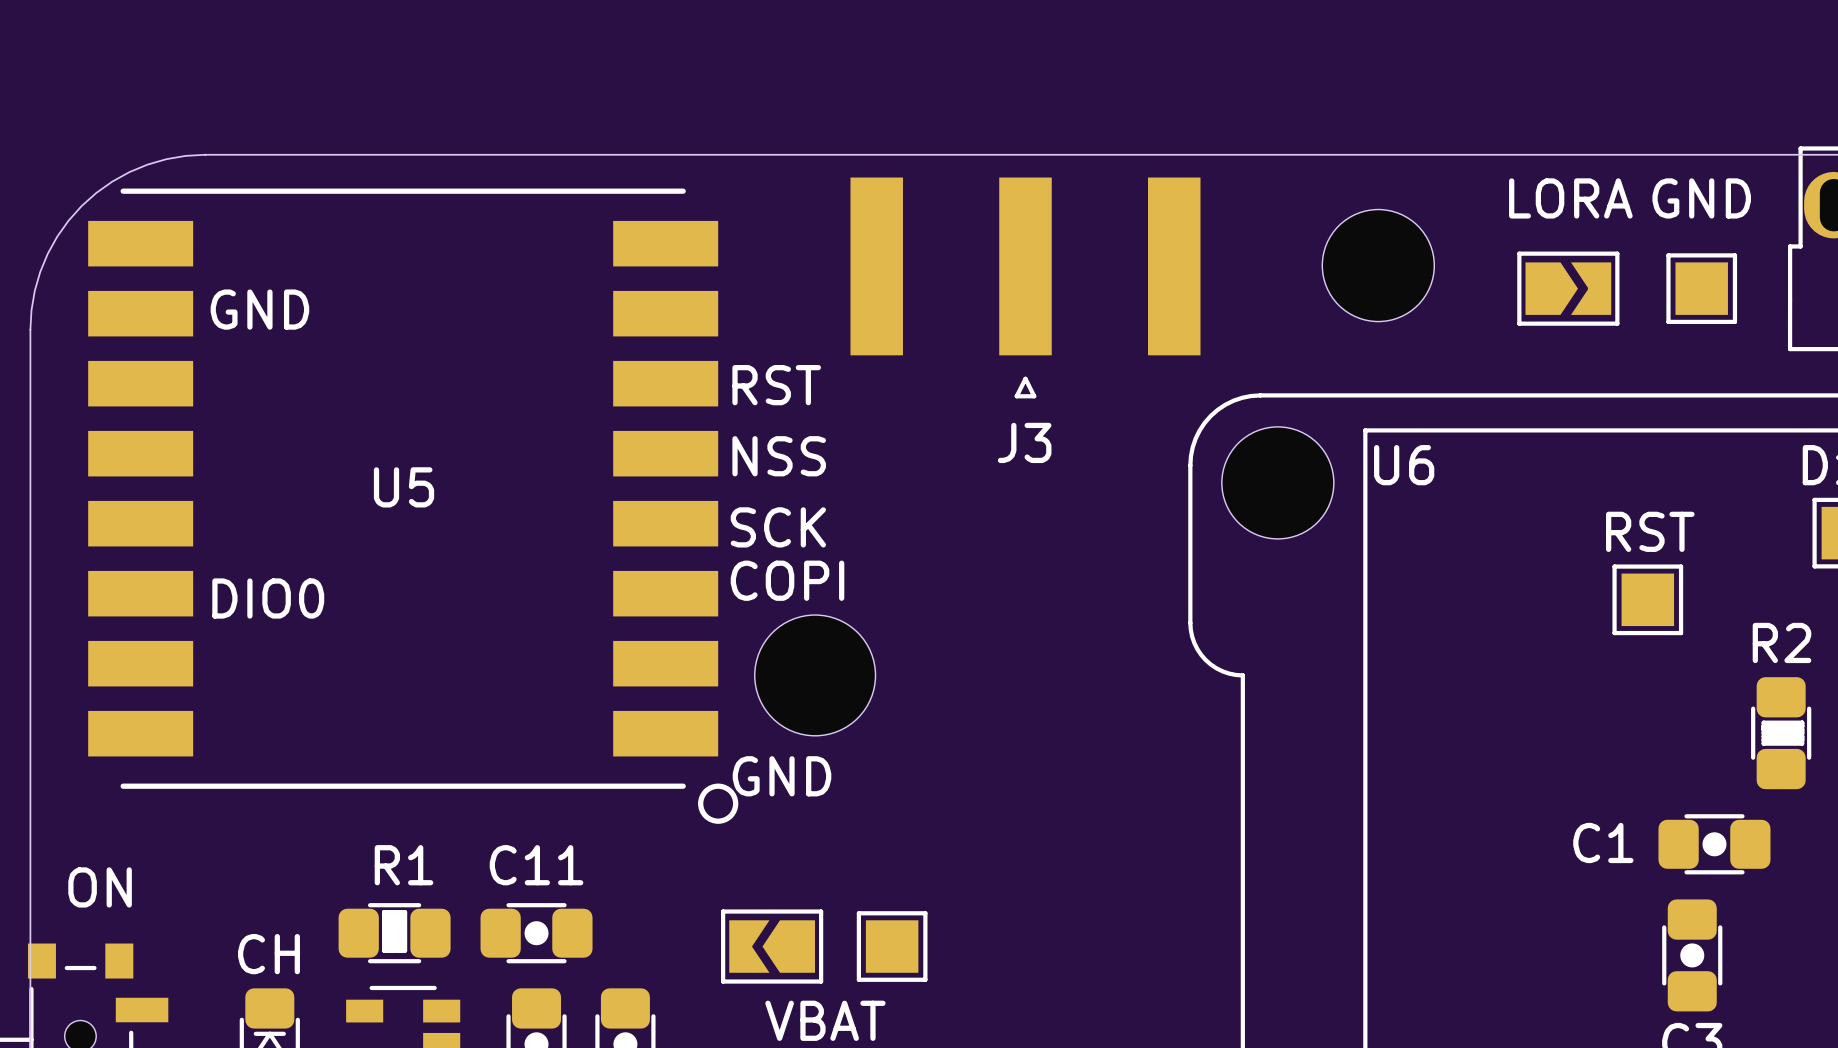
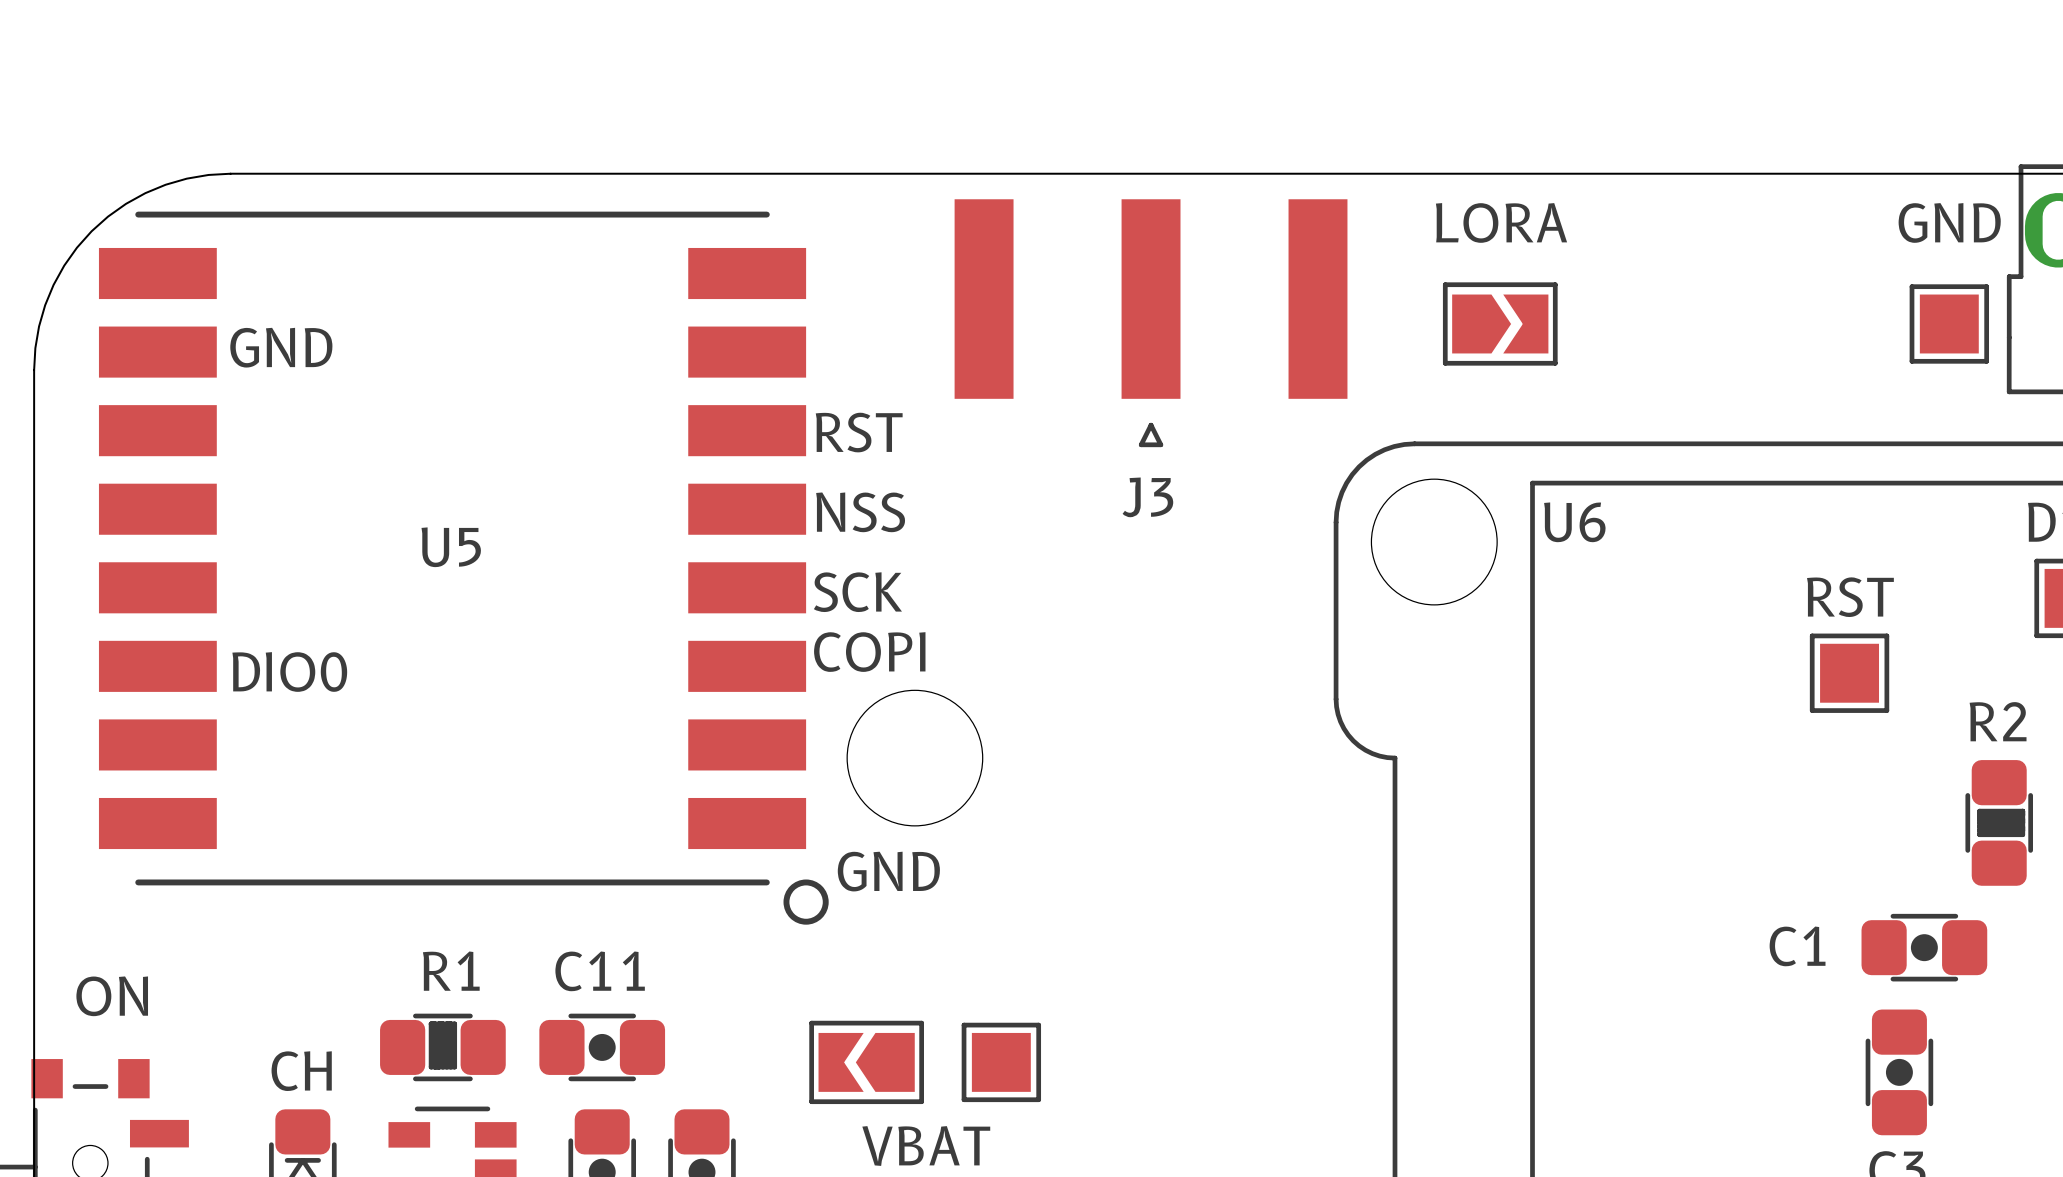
text position: LORA (1570, 198) -> LORA (1501, 222)
text position: GND (1701, 198) -> GND (1949, 222)
part: (1378, 265) -> none
part position: (1568, 288) -> (1500, 323)
part position: (1701, 288) -> (1949, 323)

